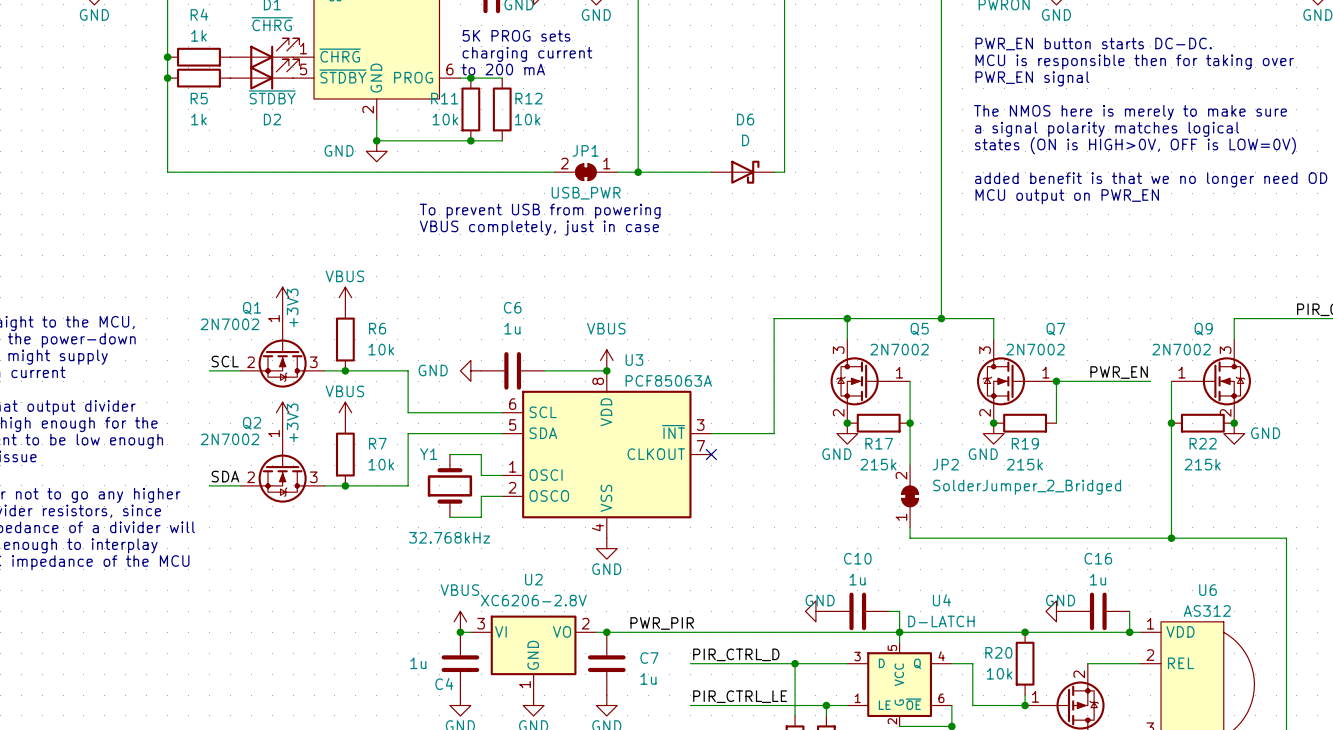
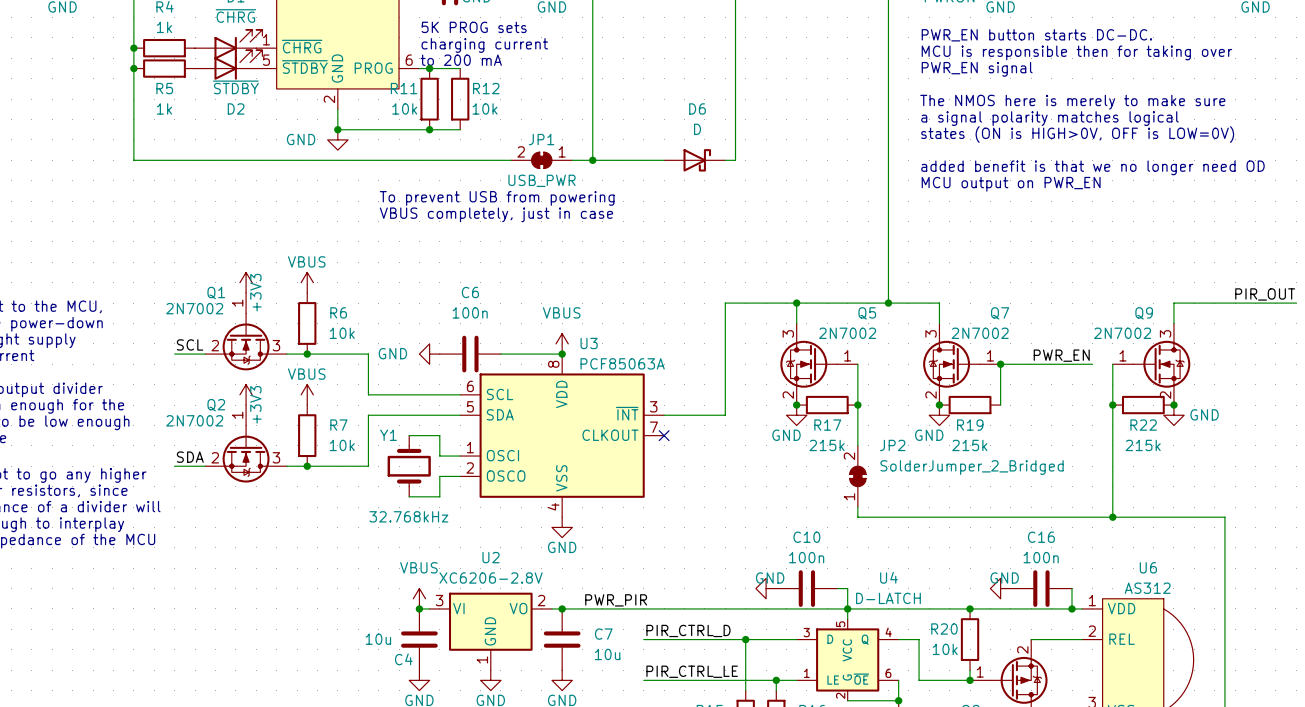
C6 text: 1u (512, 328) -> 100n (470, 312)
C10 text: 1u (857, 579) -> 100n (806, 557)
C16 text: 1u (1098, 579) -> 100n (1041, 557)
C4 text: 1u (418, 663) -> 10u (378, 639)
C7 text: 1u (648, 678) -> 10u (607, 654)

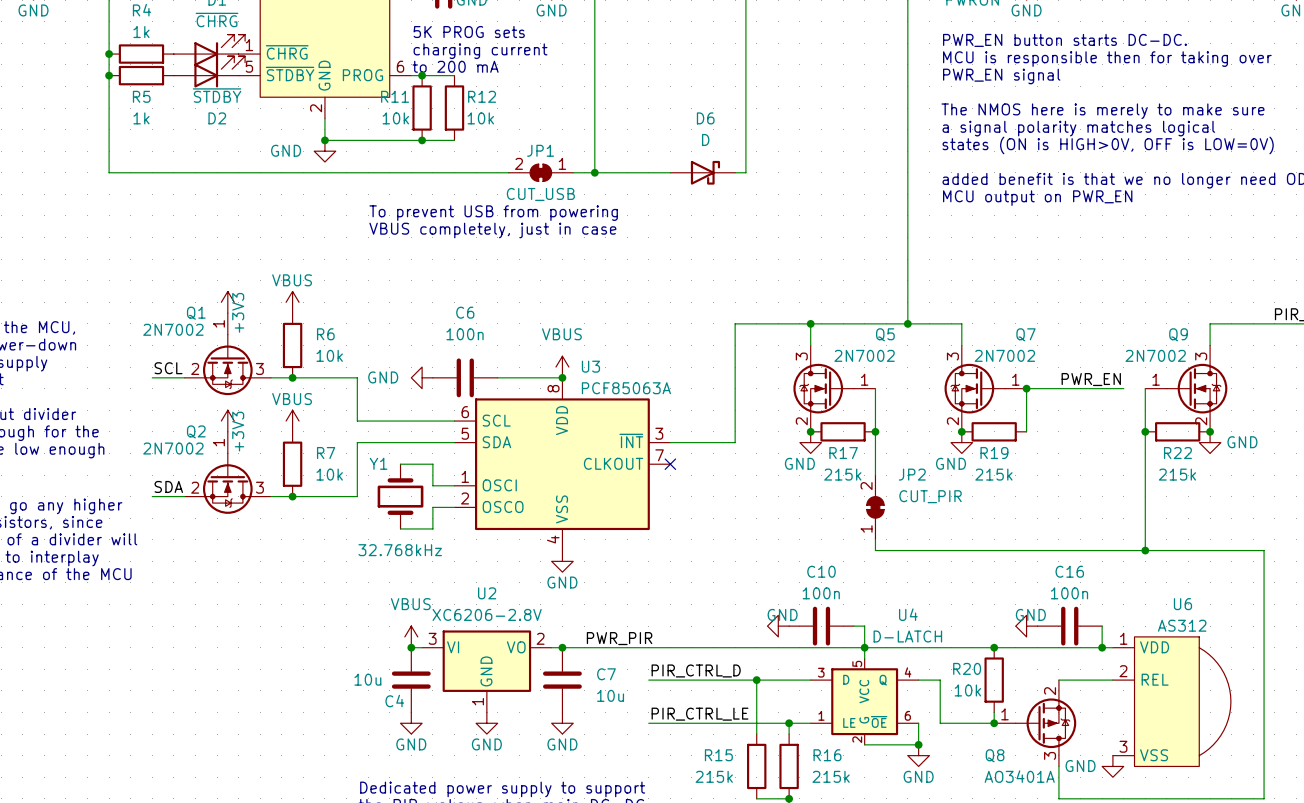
JP1 value: USB_PWR (542, 180) -> CUT_USB (540, 194)
JP2 value: SolderJumper_2_Bridged (972, 467) -> CUT_PIR (930, 496)

